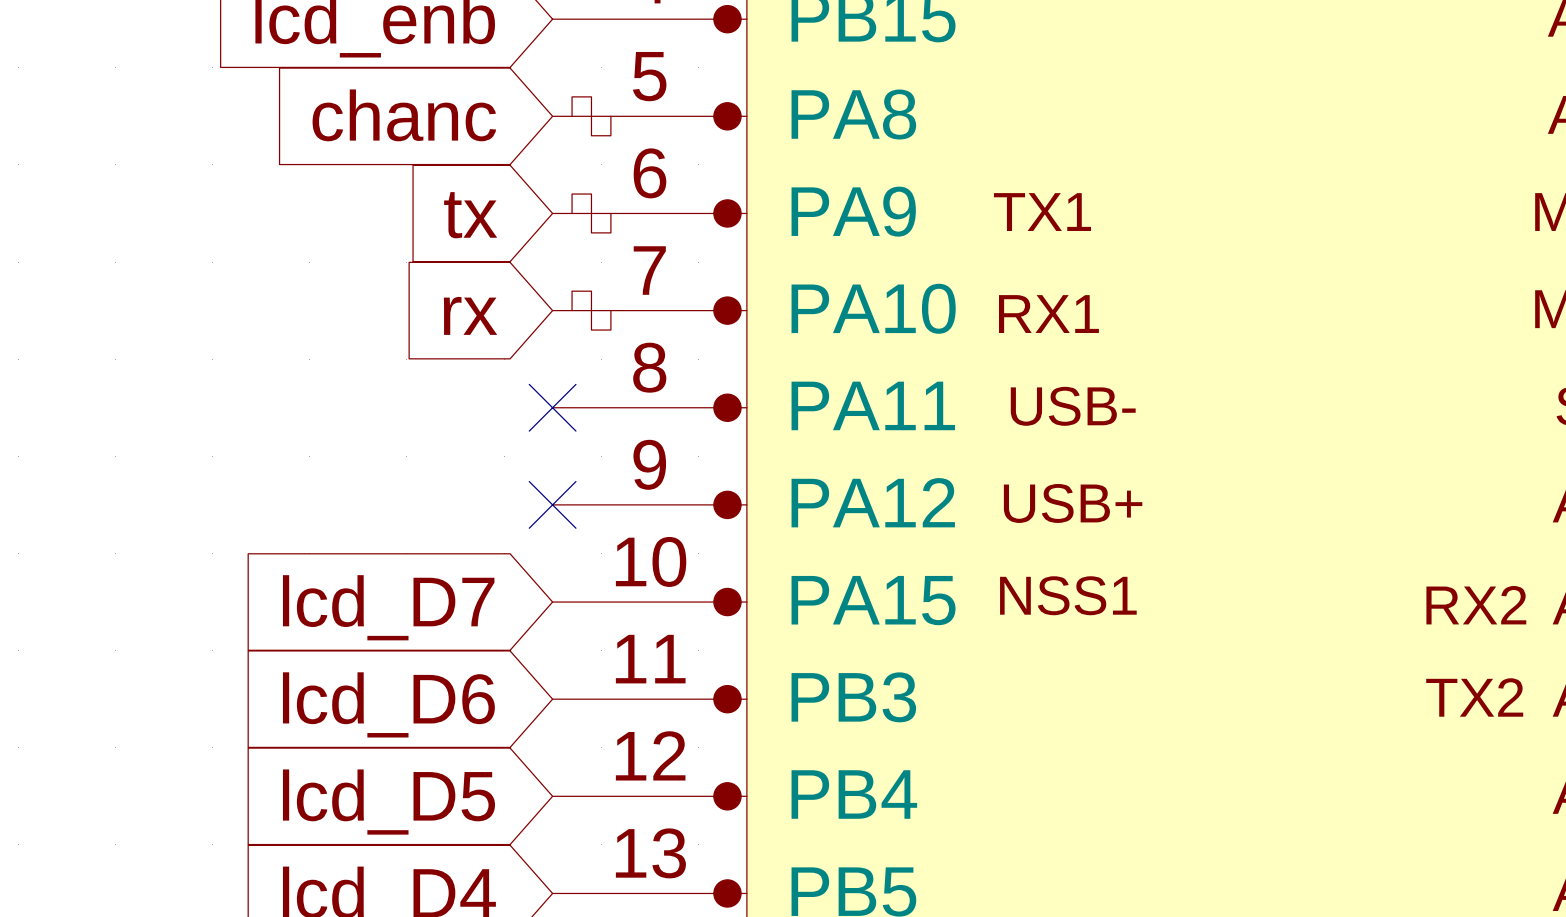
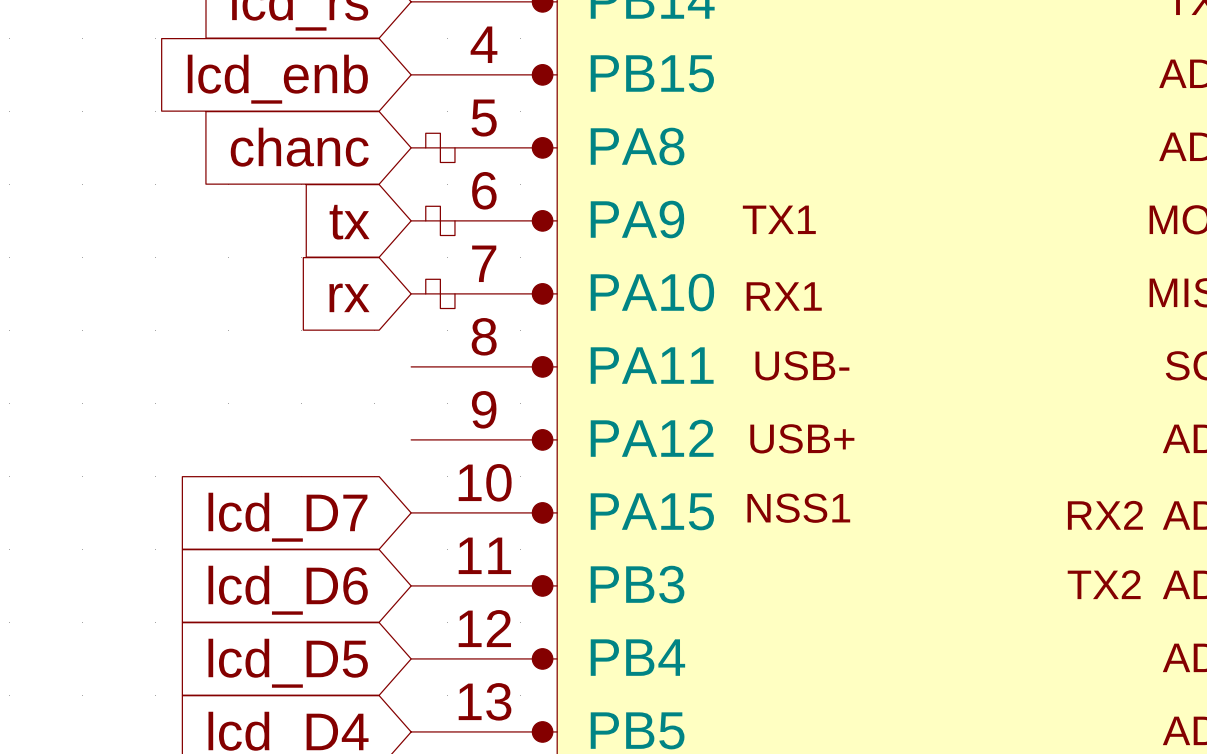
no-connect mark: (552, 407) -> none
no-connect mark: (552, 504) -> none

